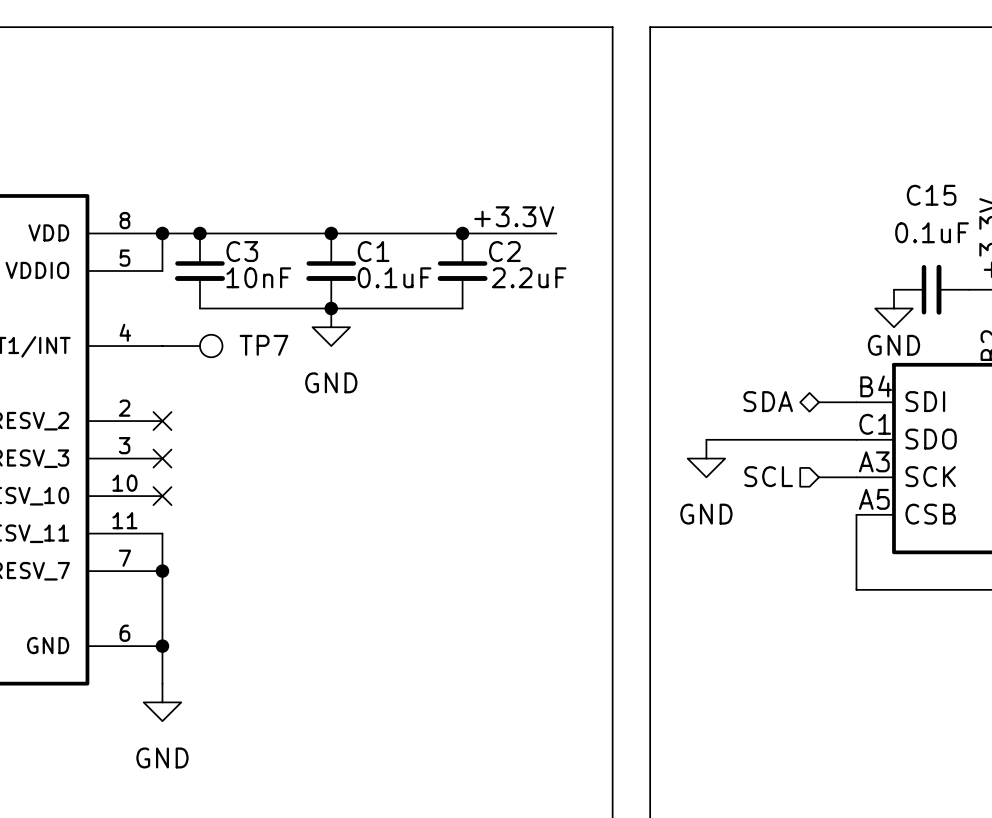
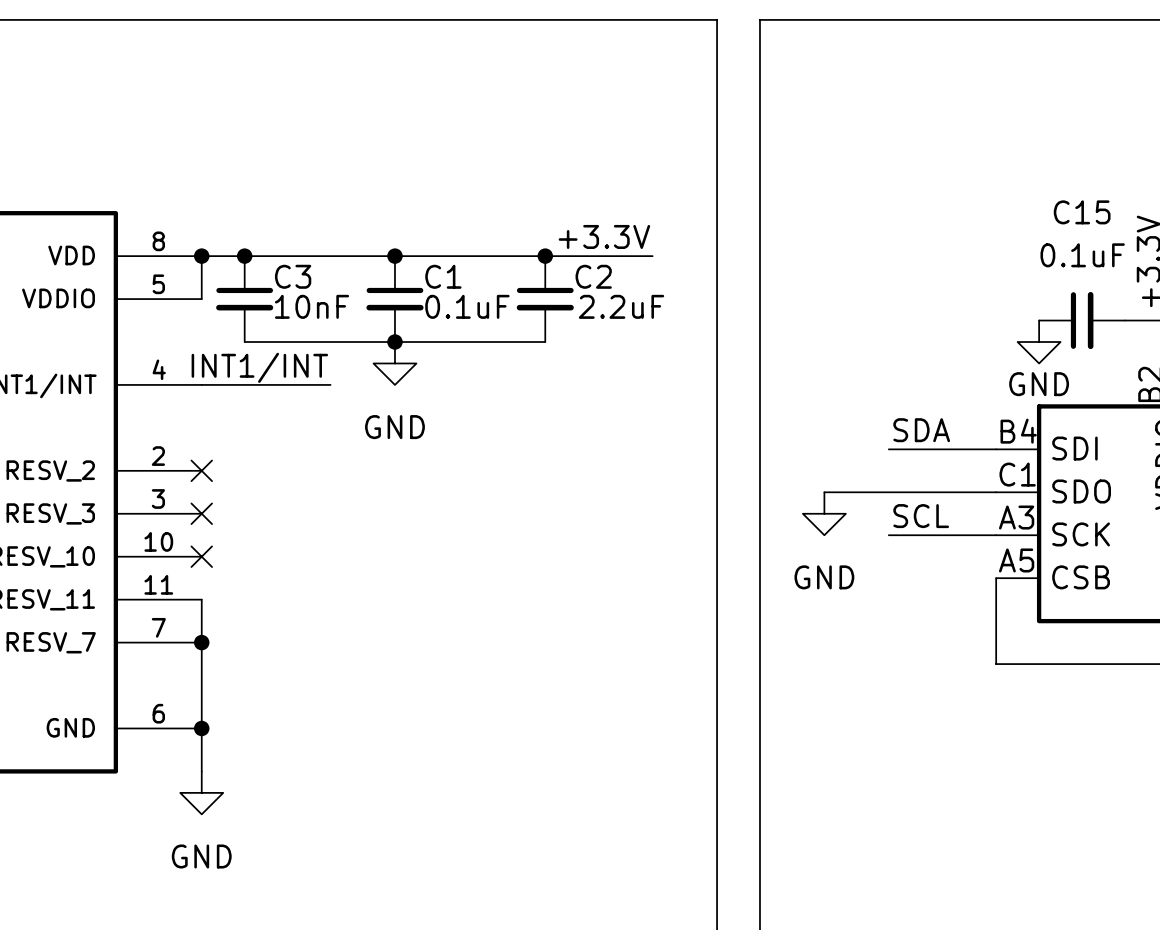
label: none -> INT1/INT (259, 367)
wire: none -> (201, 384) (330, 384)
TP7: (192, 346) -> none
label: none -> SDA (921, 430)
hierarchical label: SDA (768, 401) -> none
wire: none -> (888, 449) (953, 449)
label: none -> SCL (921, 516)
hierarchical label: SCL (768, 476) -> none
wire: none -> (888, 535) (953, 535)

